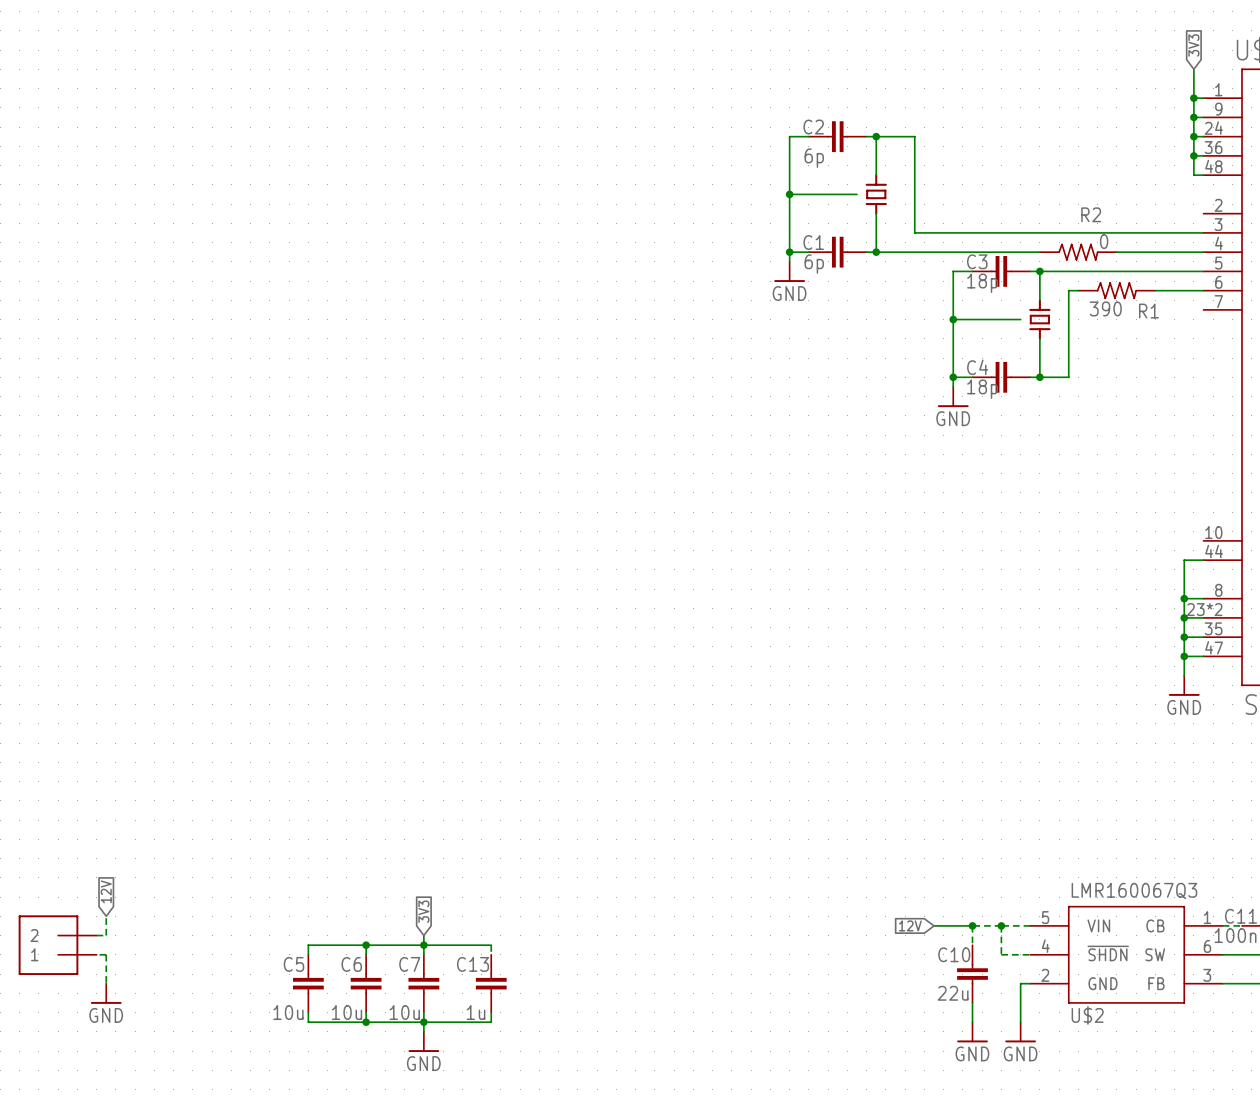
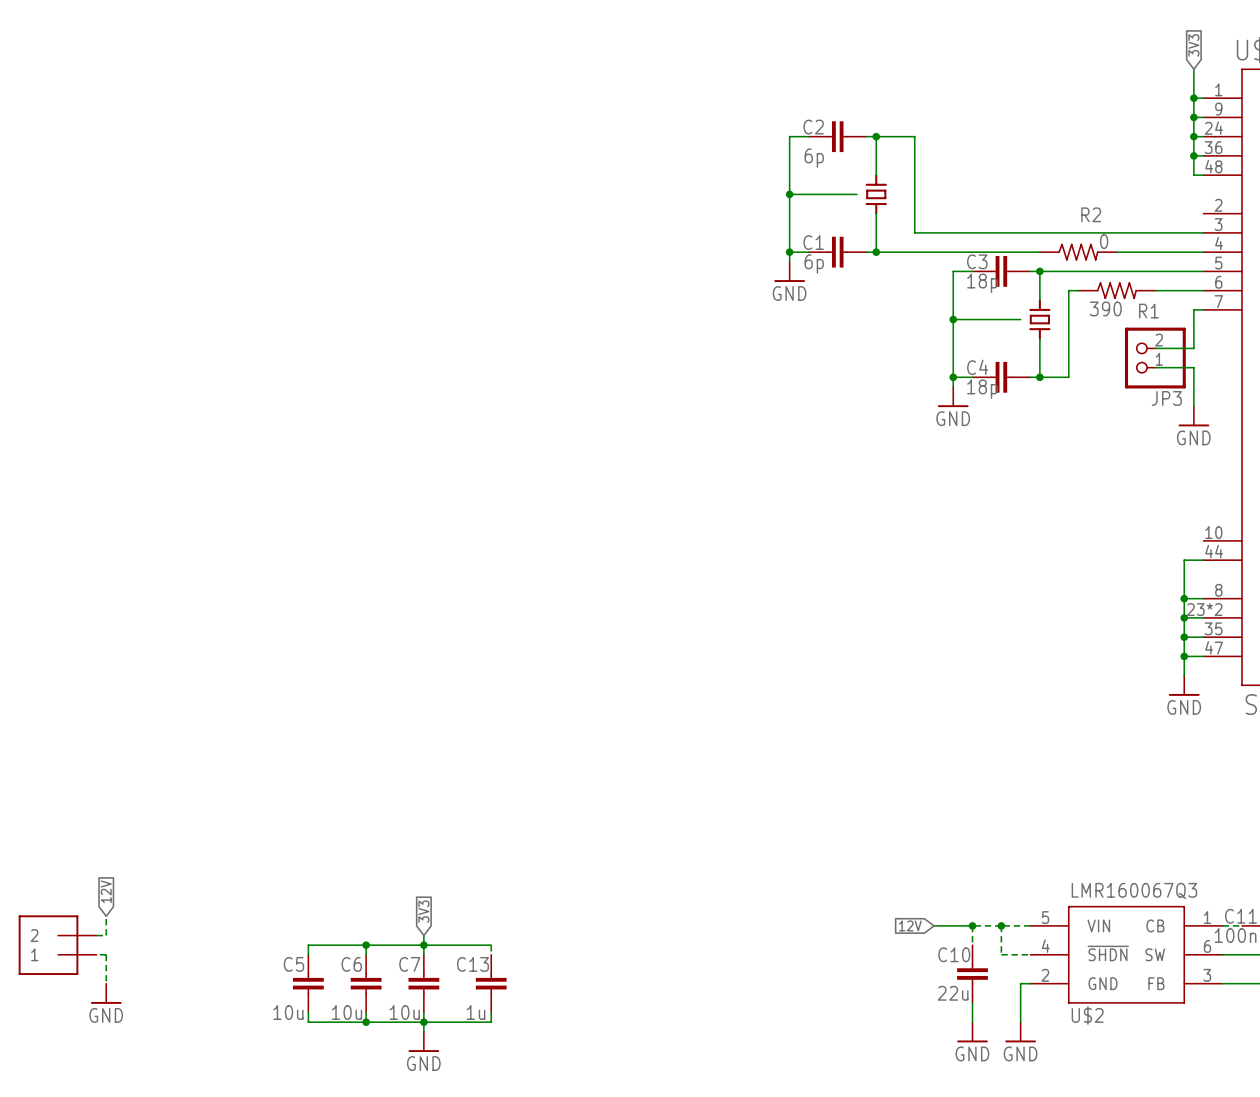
wire: none -> (1203, 309) (1193, 309) (1193, 348) (1155, 348)
JP3: none -> (1155, 358)
wire: none -> (1155, 367) (1193, 367) (1193, 406)
power symbol: none -> GND (1193, 416)

